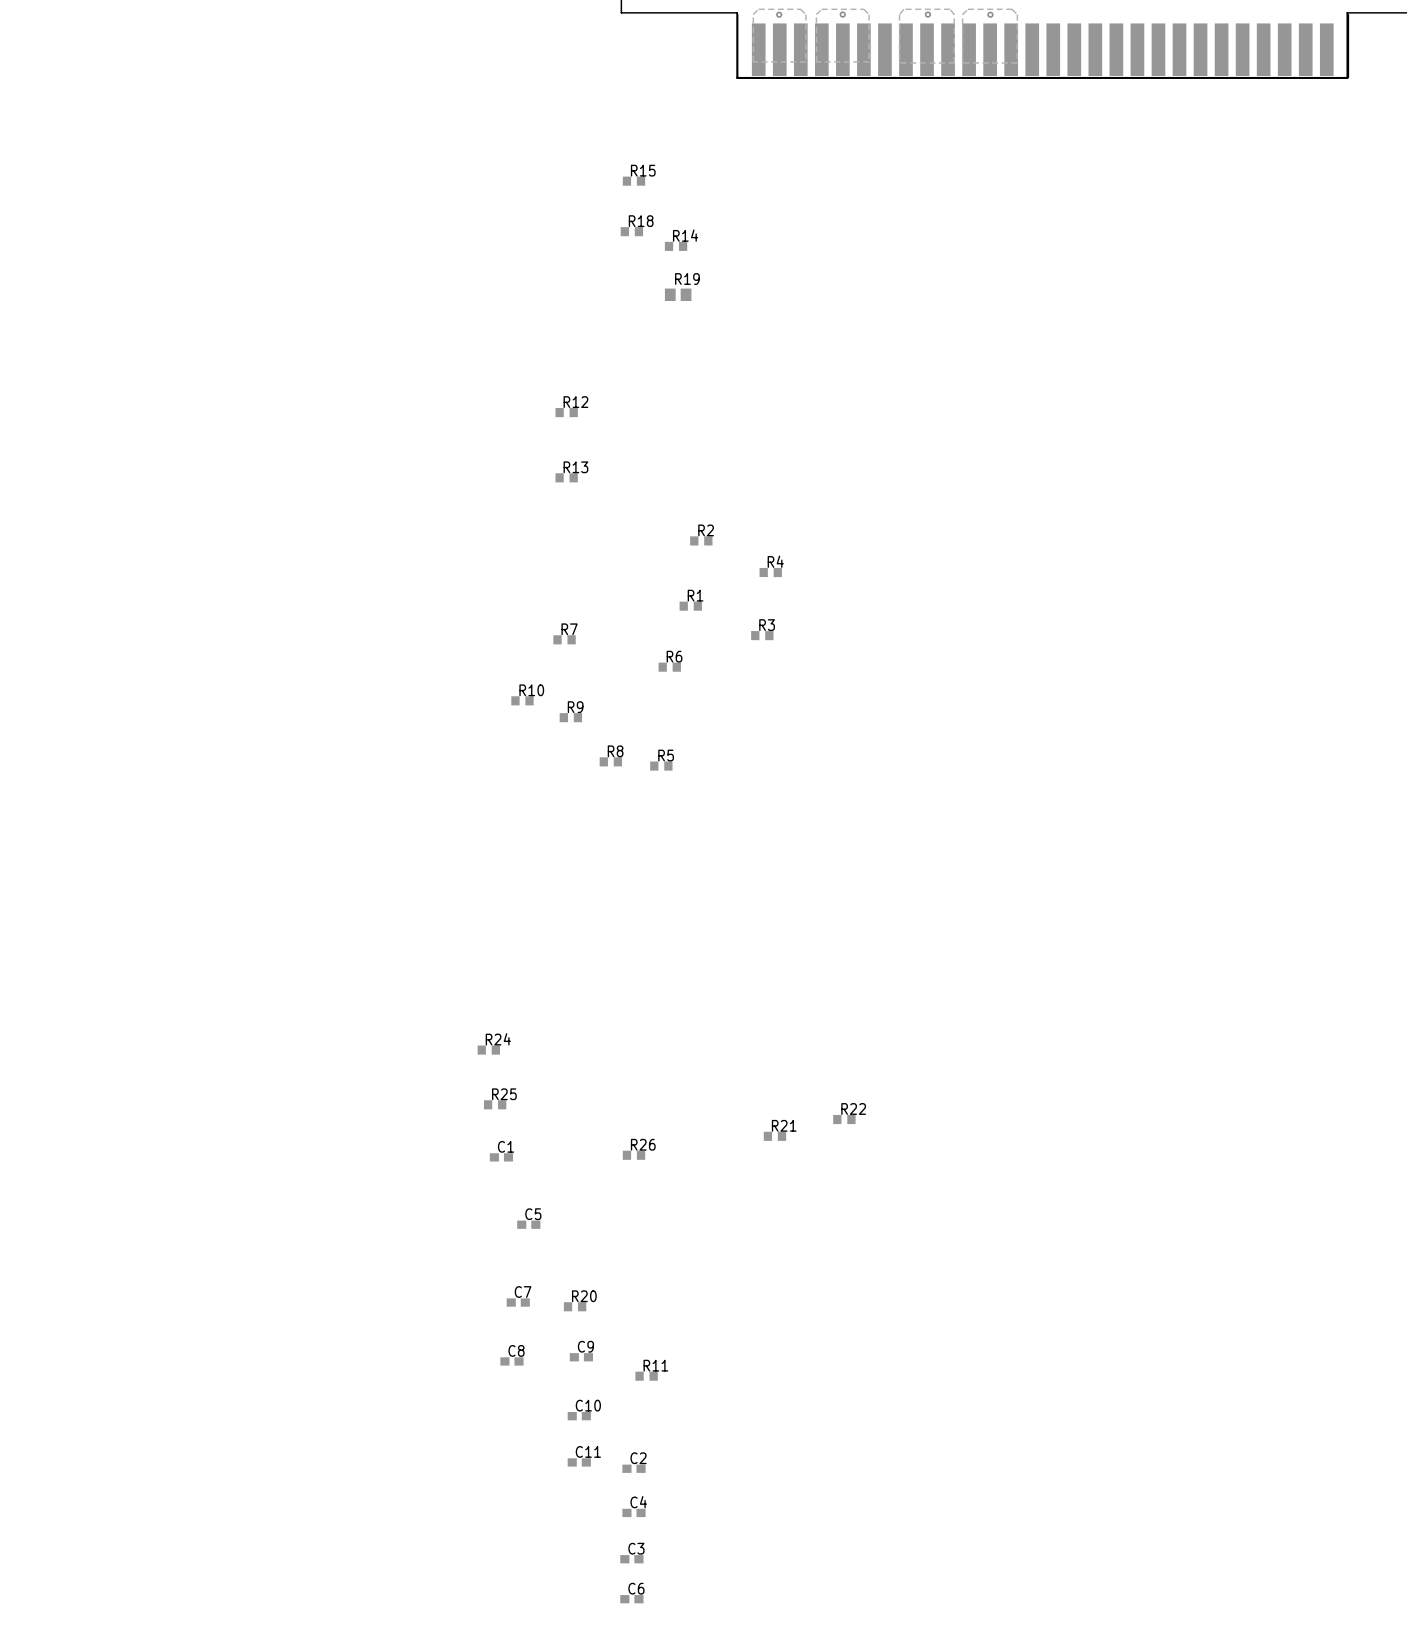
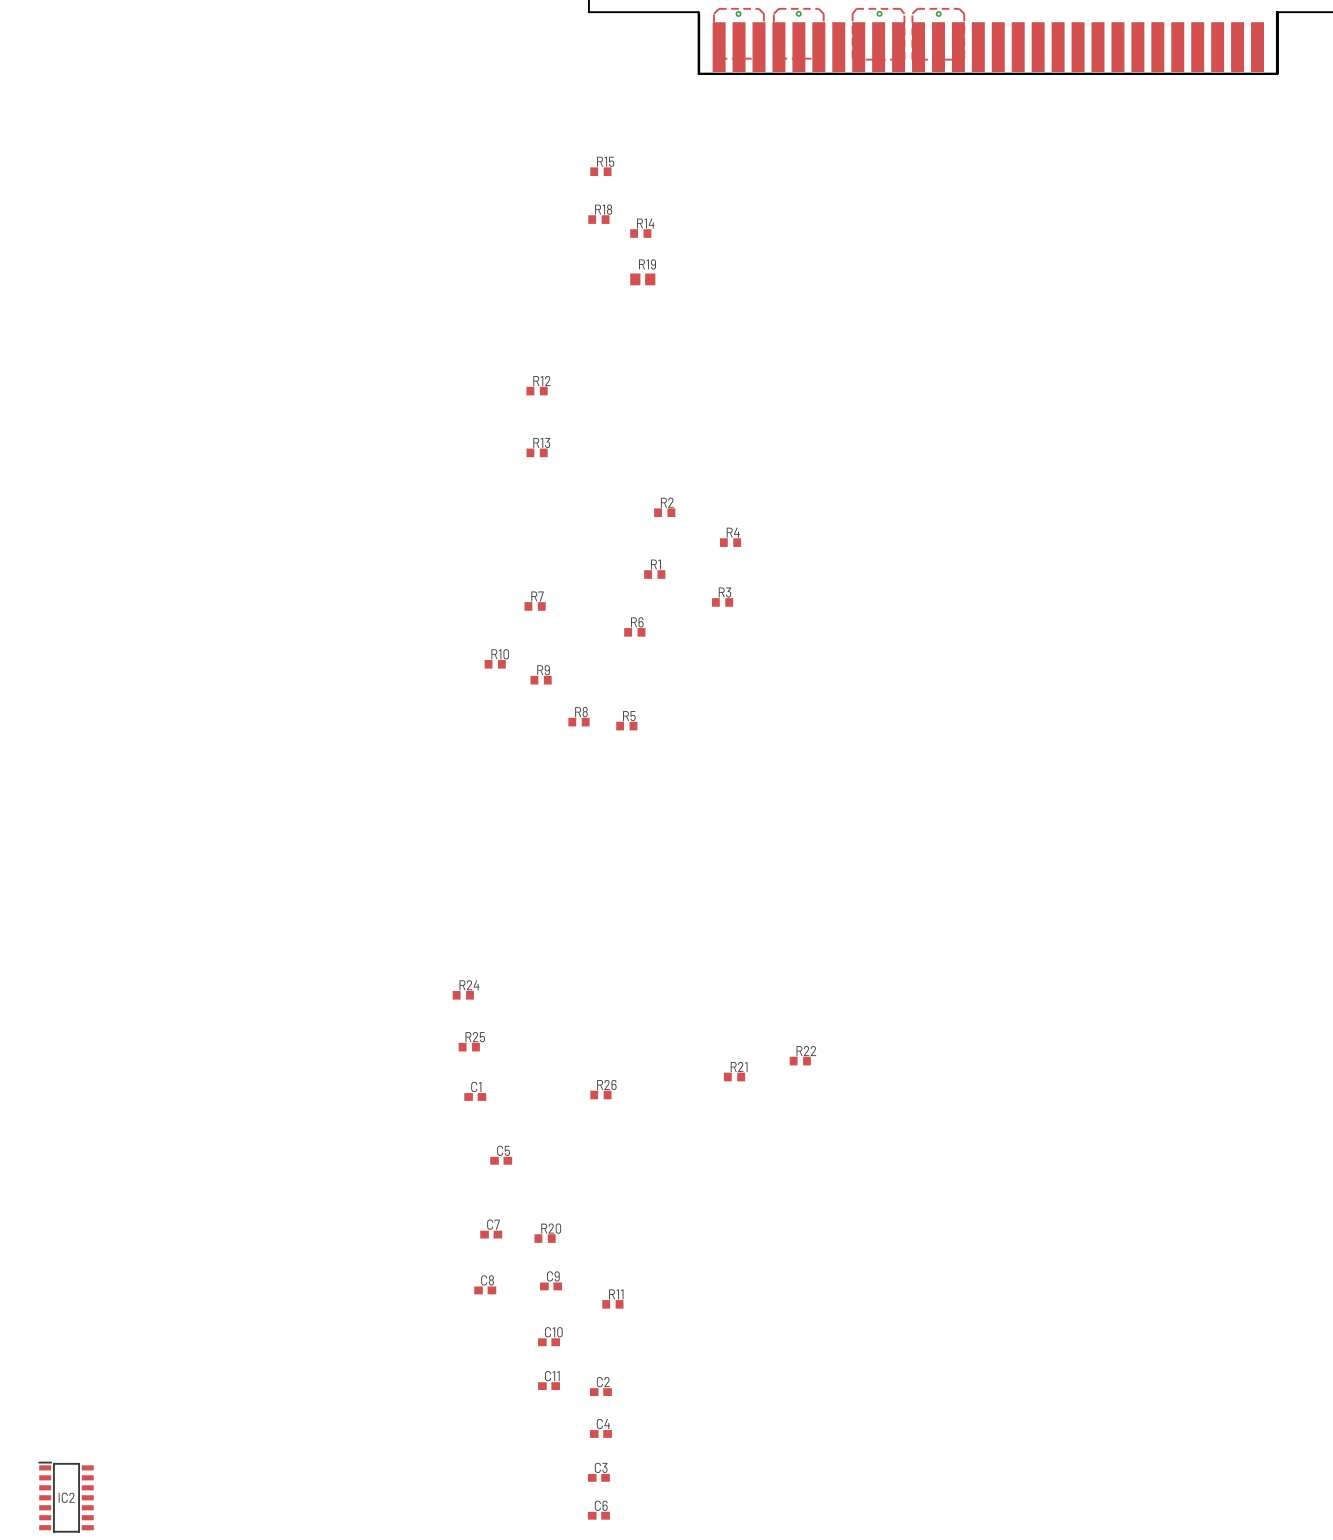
IC2: none -> (66, 1497)

